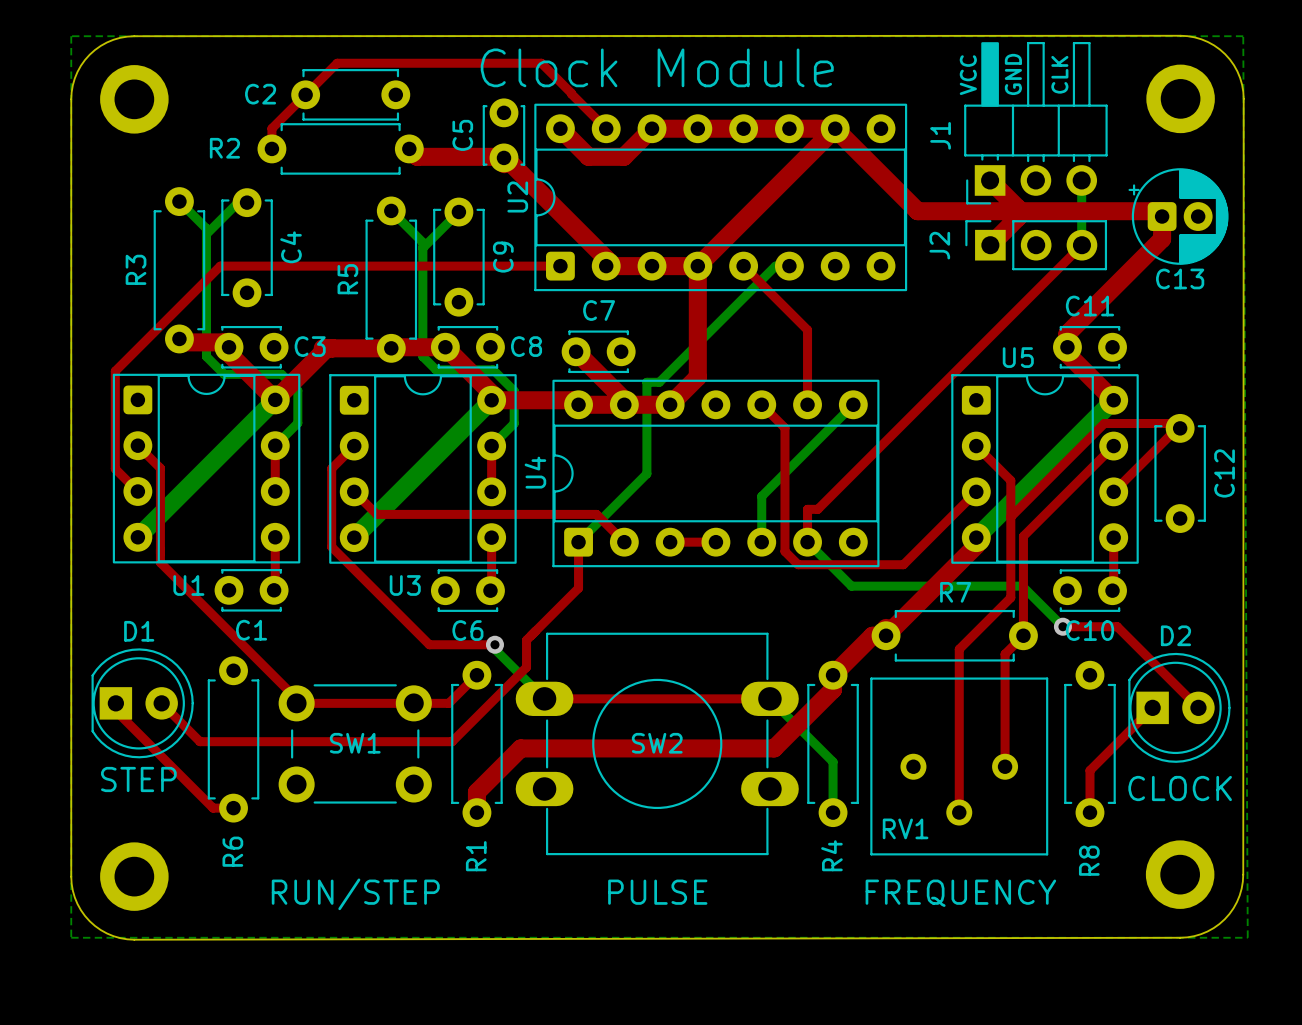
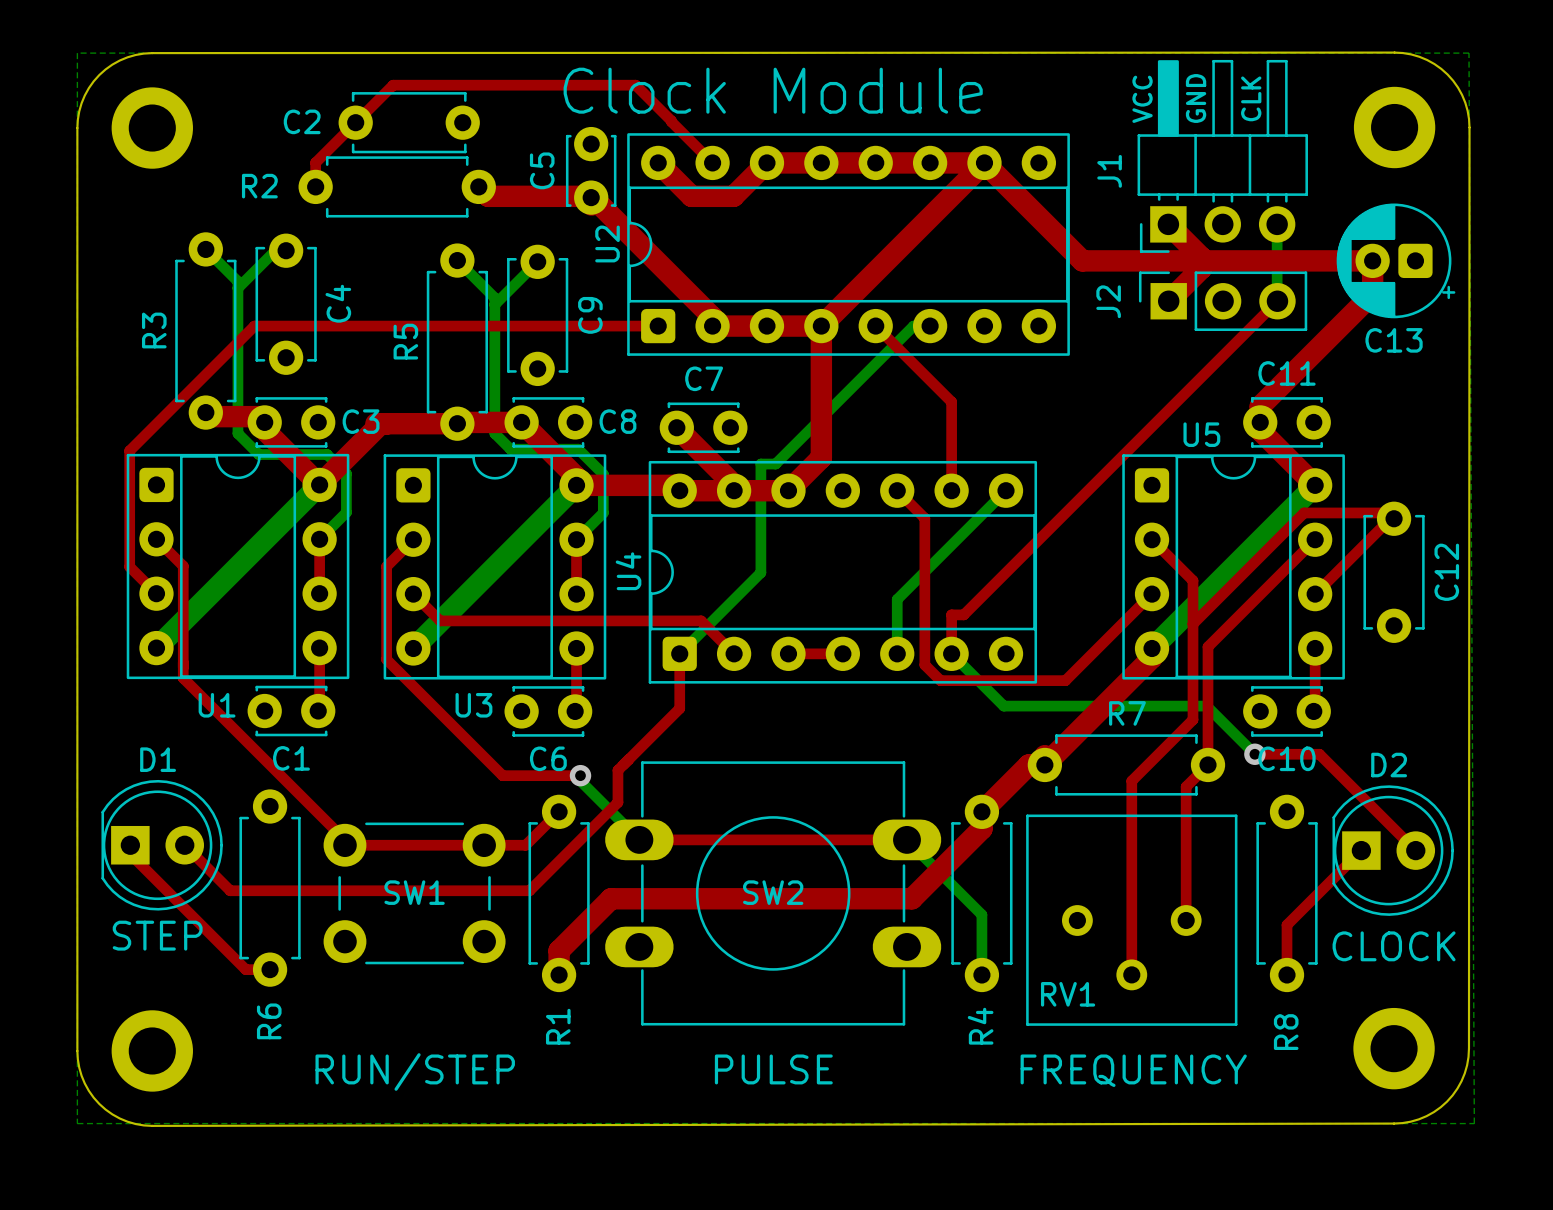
C13 rotation: 0° (1178, 216) -> 180° (1396, 260)

